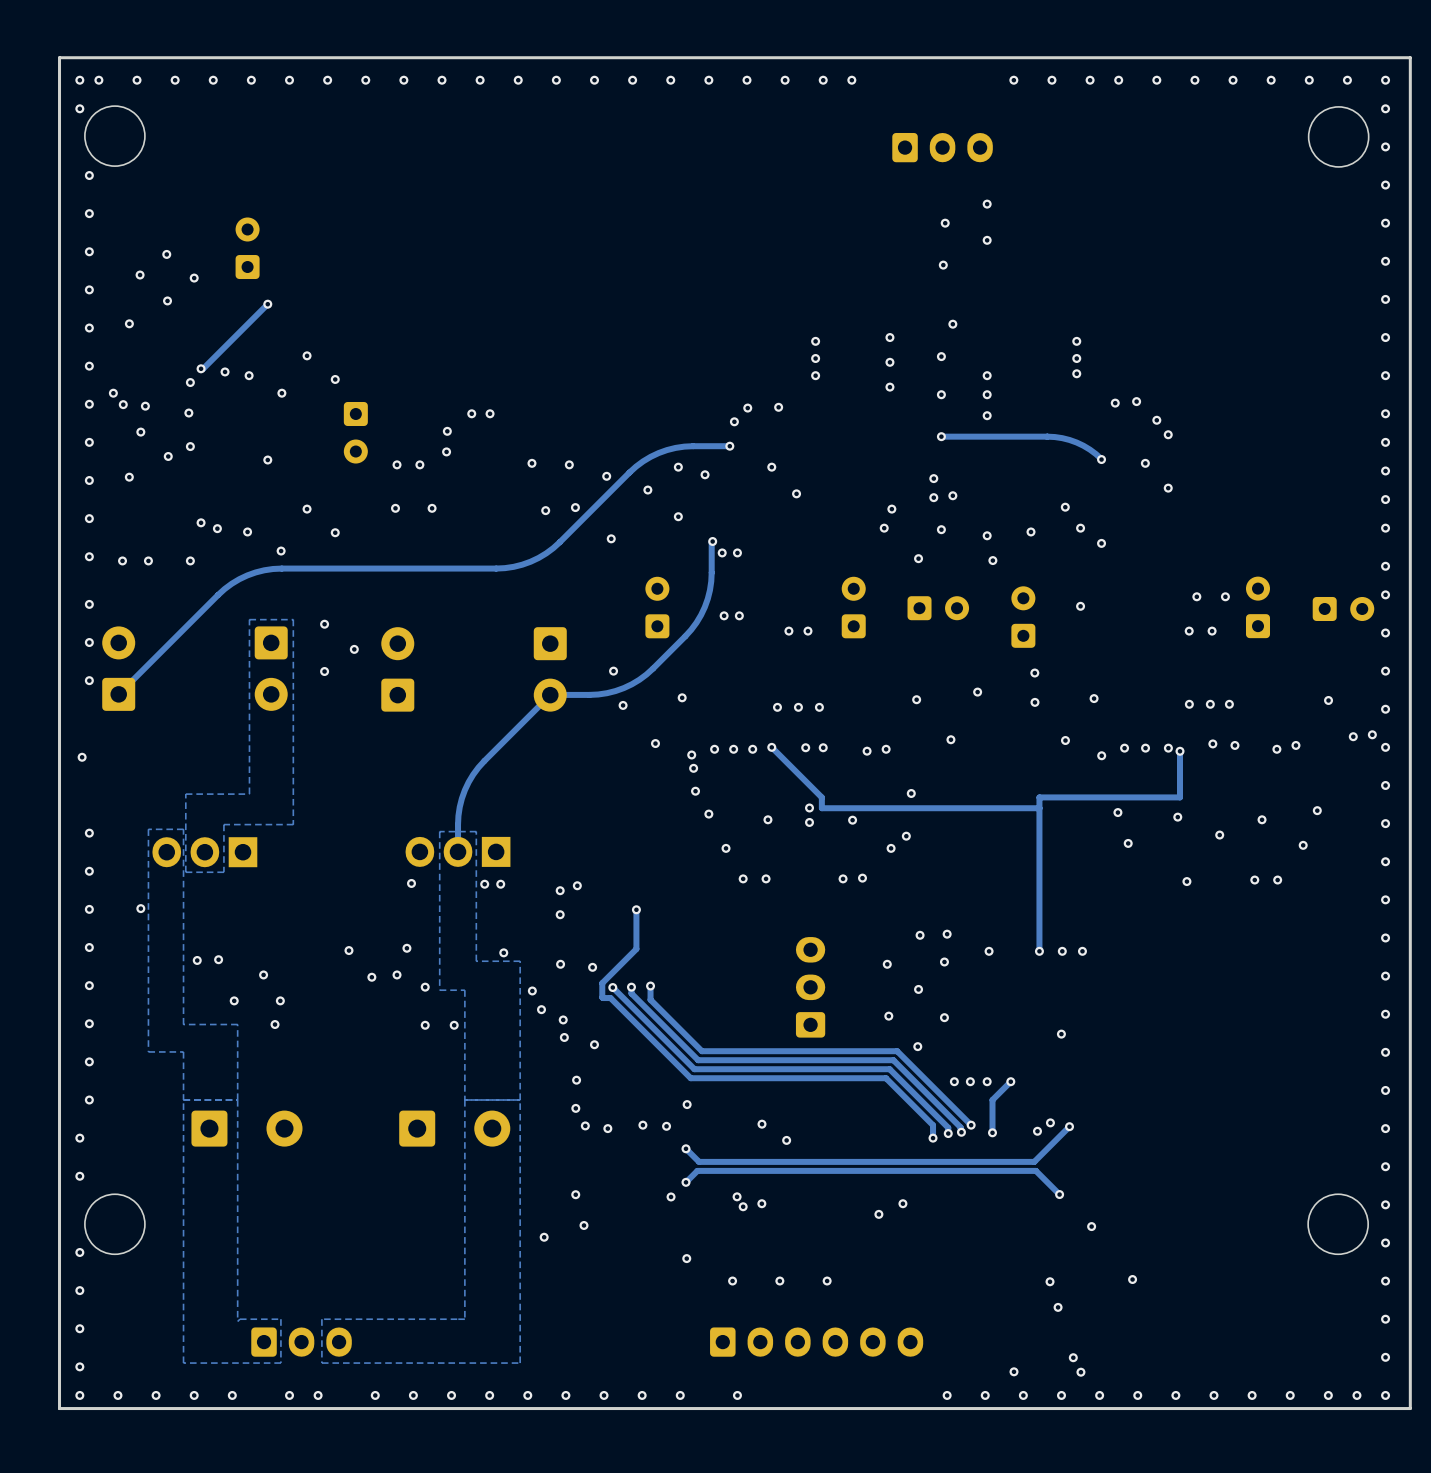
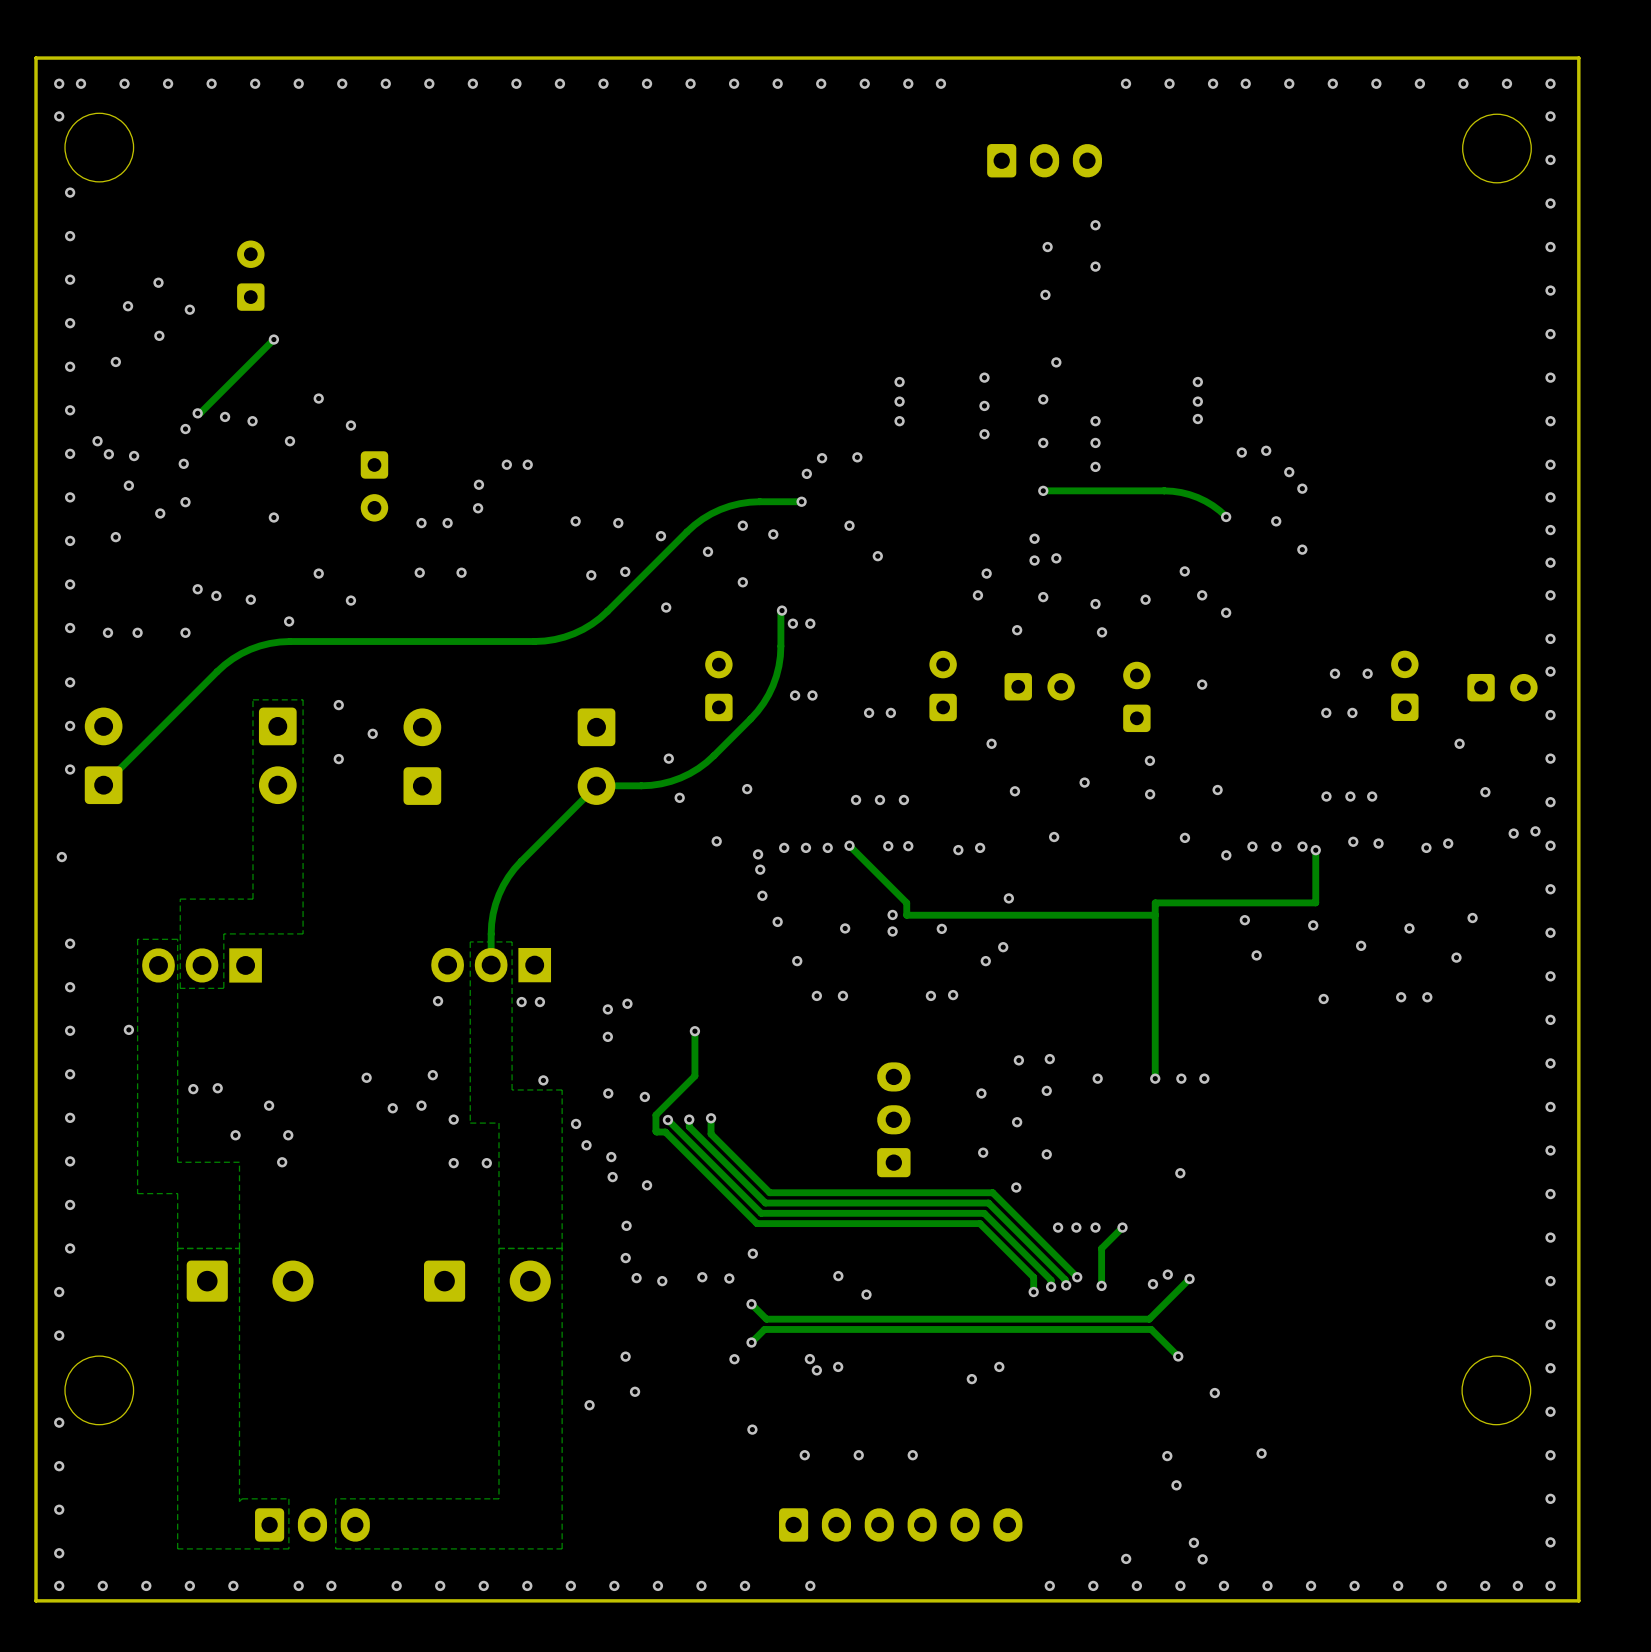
via: none -> (991, 743)
via: none -> (1459, 743)

